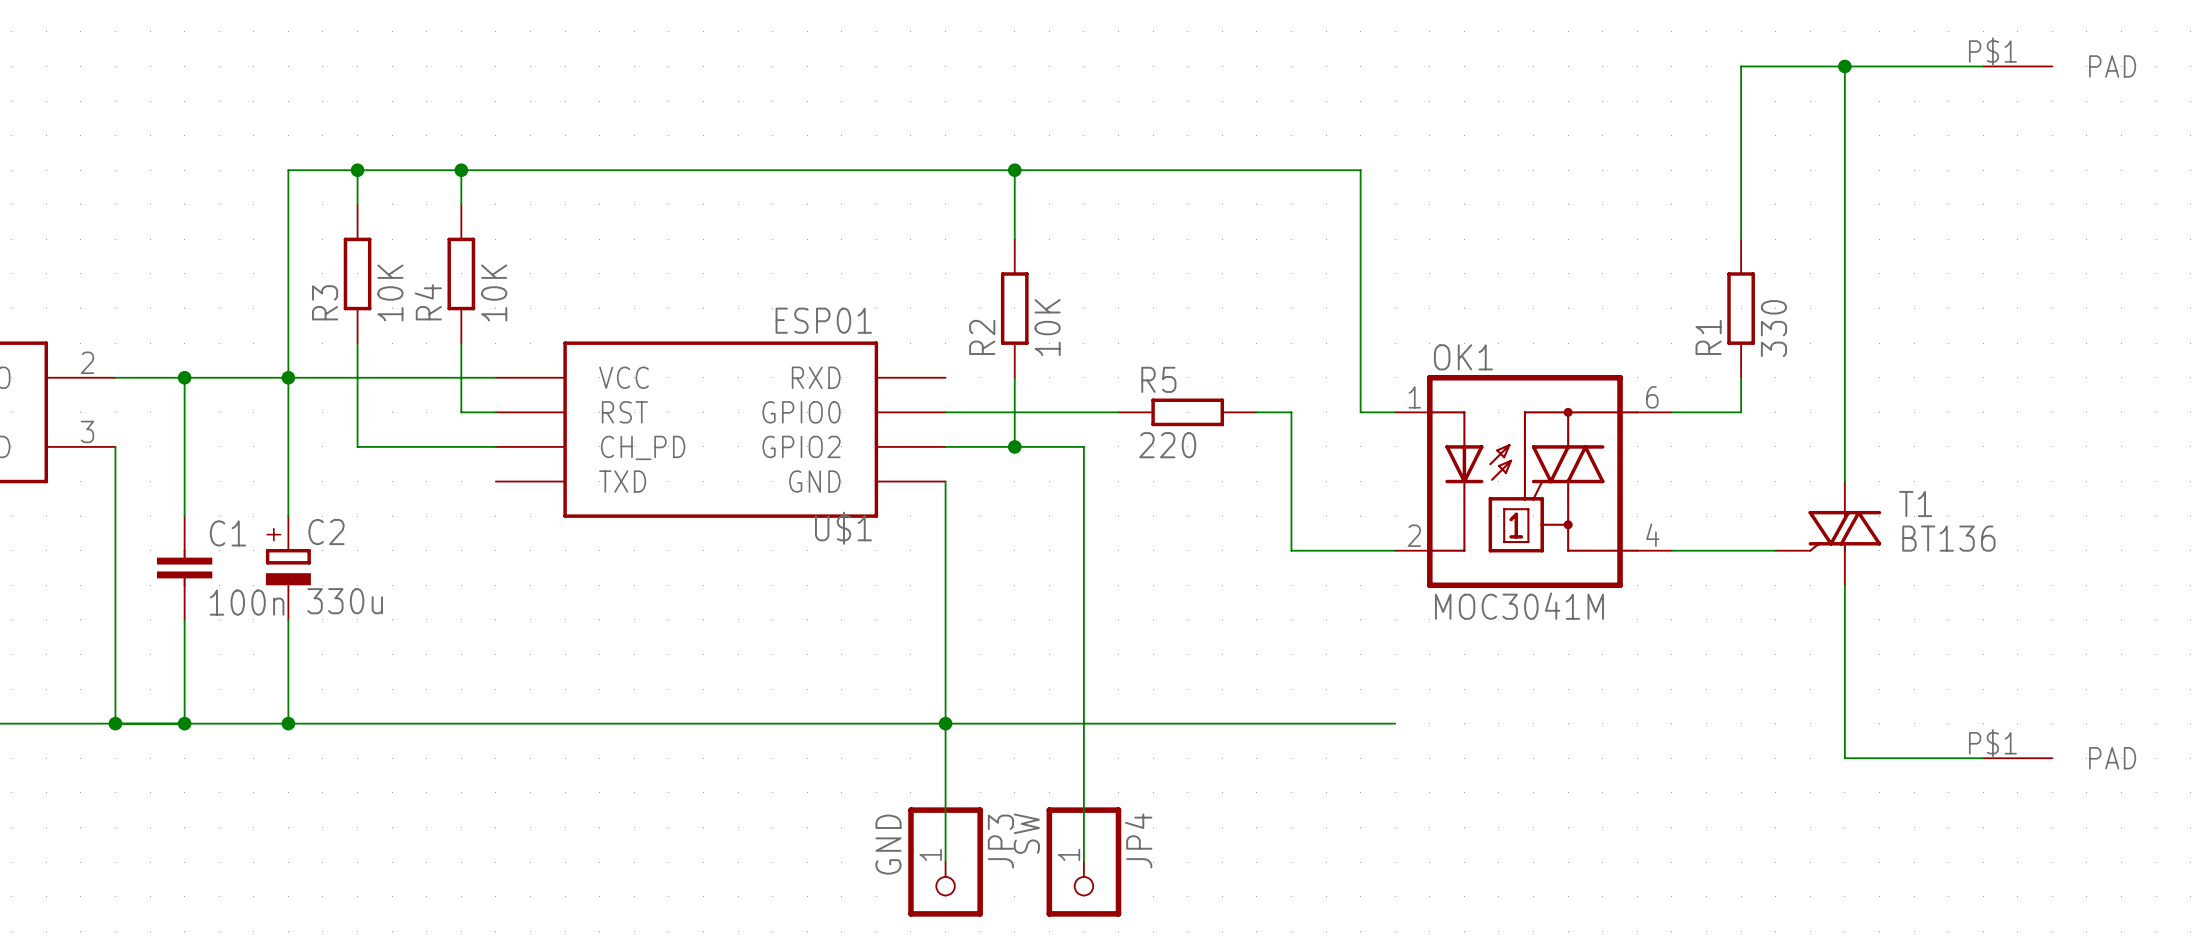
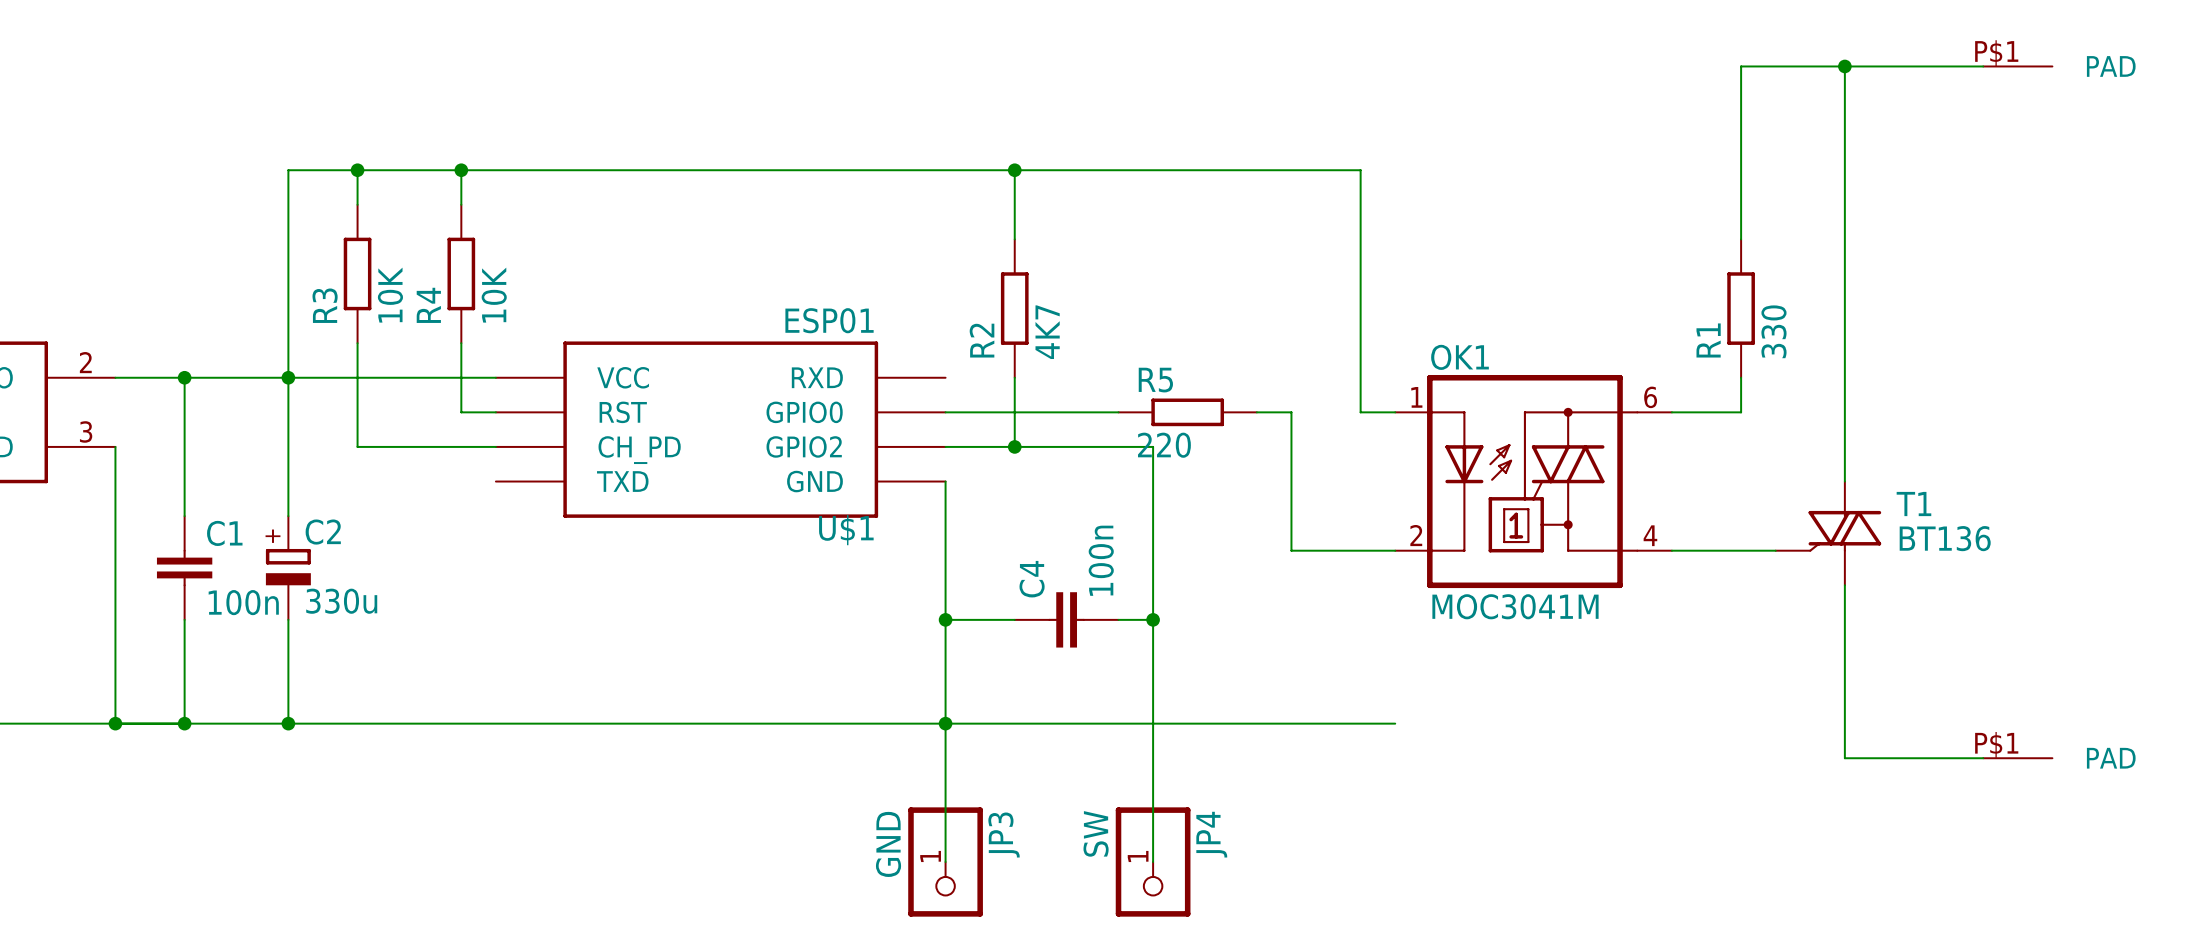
R2 value: 10K (1047, 327) -> 4K7 (1047, 332)
wire: (1083, 446) (1083, 862) -> (1083, 446) (1153, 446) (1153, 862)
wire: none -> (945, 619) (1014, 619)
junction: none -> (945, 619)
C4: none -> 100n (1066, 619)
wire: none -> (1118, 619) (1153, 619)
junction: none -> (1153, 619)
JP4 position: (1083, 862) -> (1153, 862)

